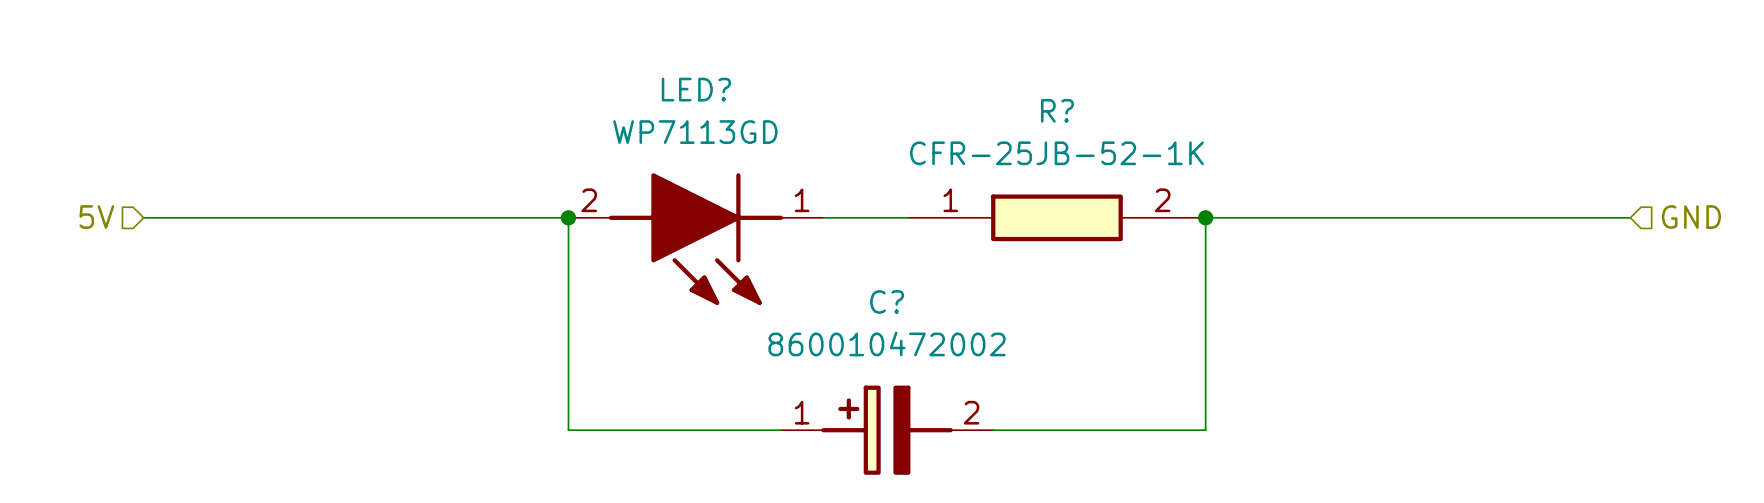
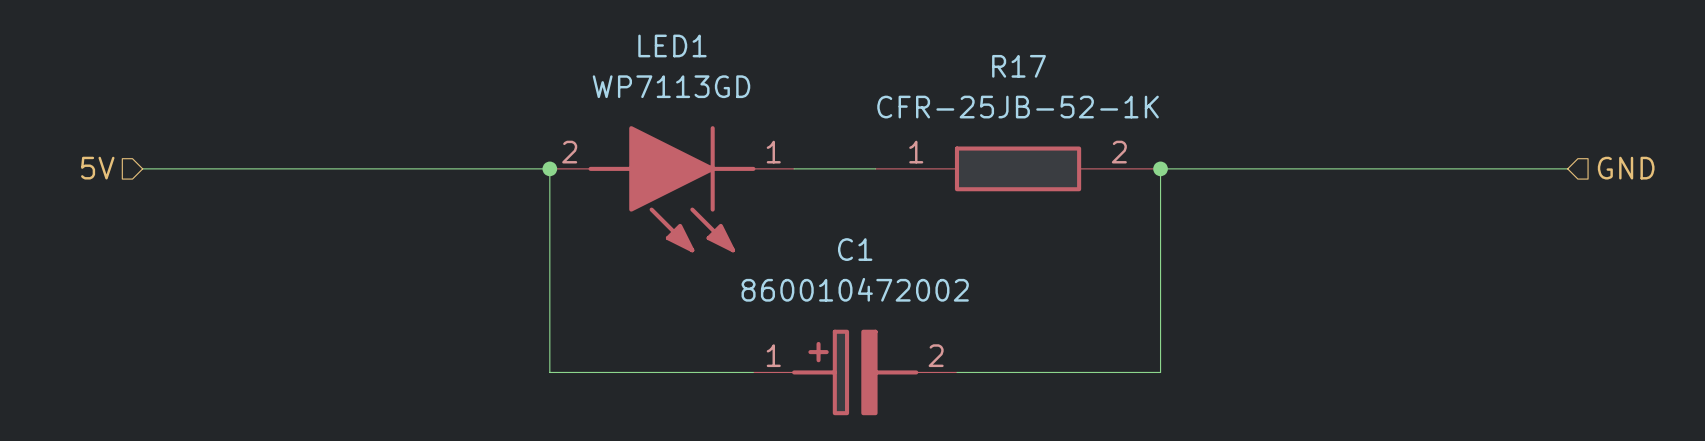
LED? name: LED? (696, 89) -> LED1 (672, 45)
R? name: R? (1057, 110) -> R17 (1019, 66)
C? name: C? (887, 301) -> C1 (855, 249)

